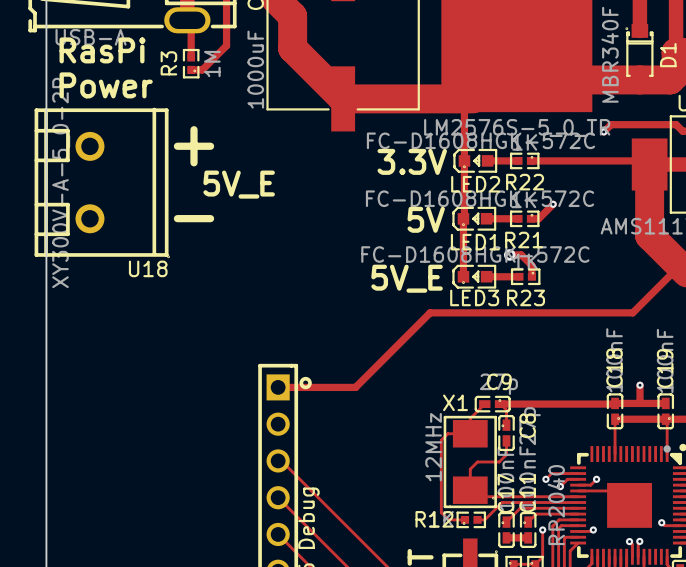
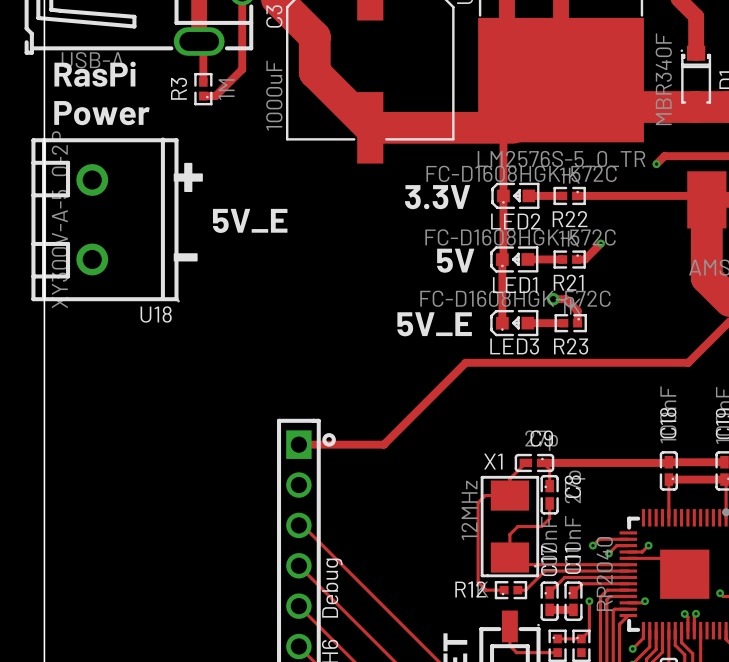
track: (640, 385) (640, 403) -> none
via: (640, 385) -> none

